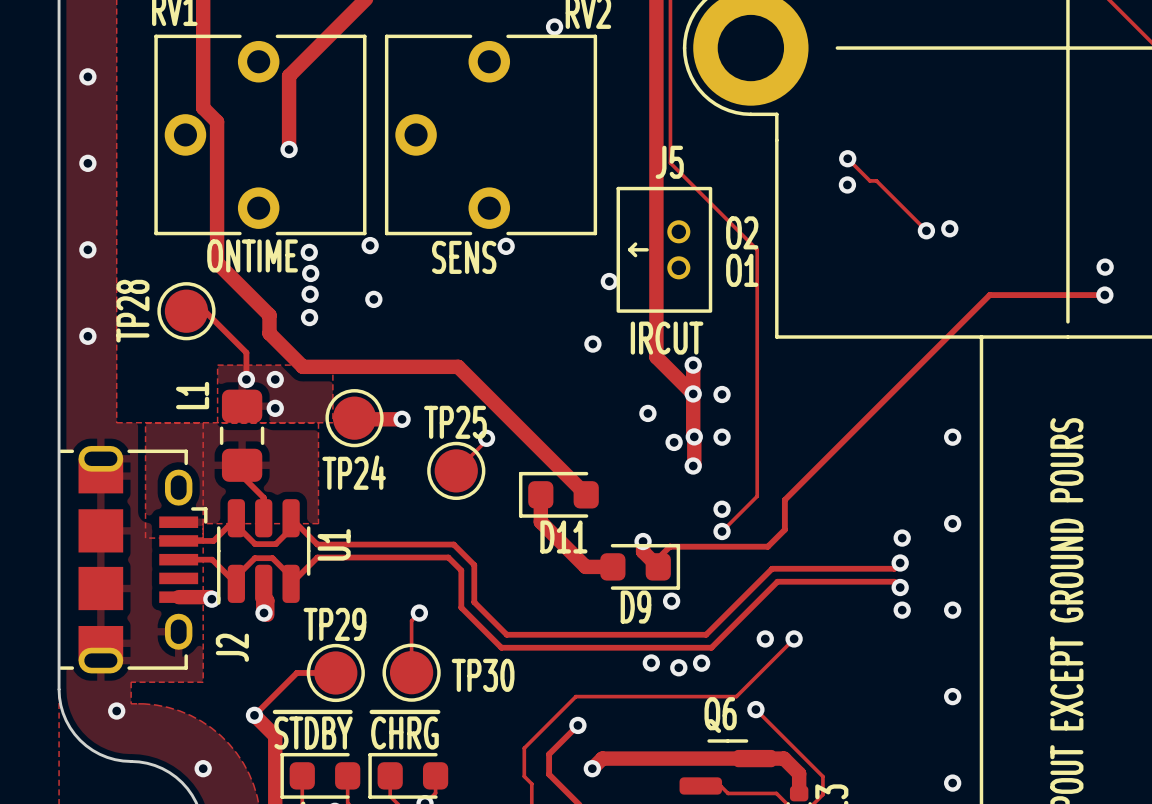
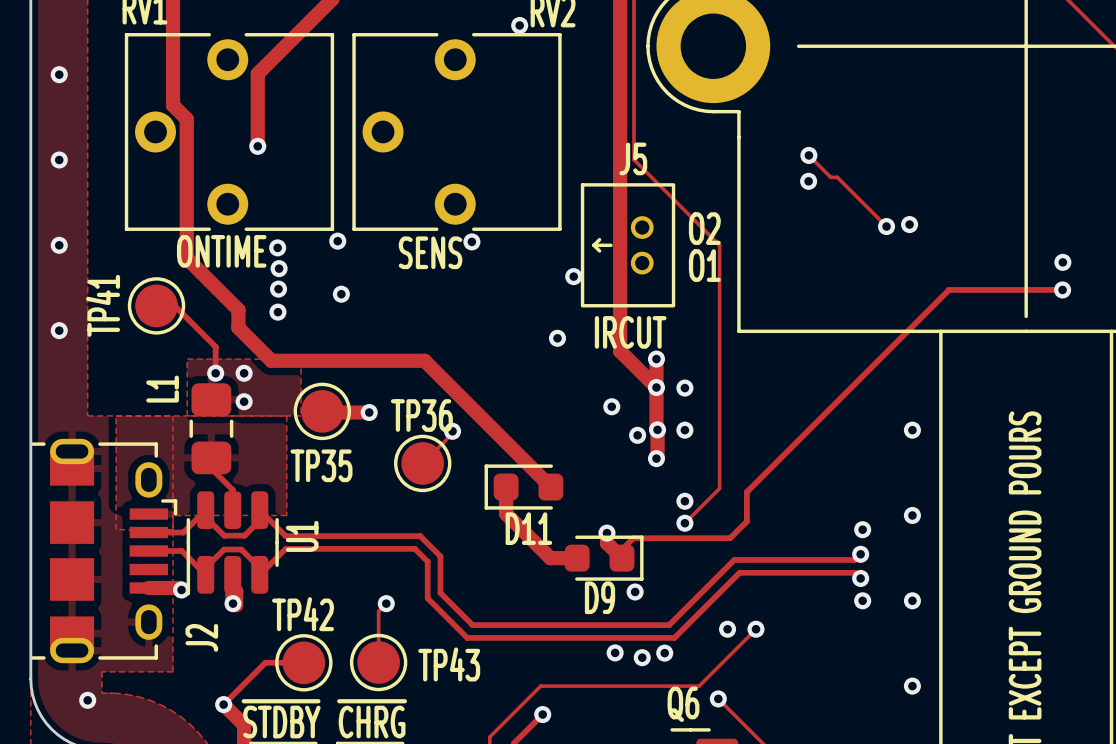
TP28 name: TP28 (132, 311) -> TP41 (103, 305)
TP25 name: TP25 (455, 422) -> TP36 (421, 415)
TP24 name: TP24 (354, 472) -> TP35 (321, 465)
TP29 name: TP29 (334, 624) -> TP42 (303, 614)
TP30 name: TP30 (483, 675) -> TP43 (449, 664)

